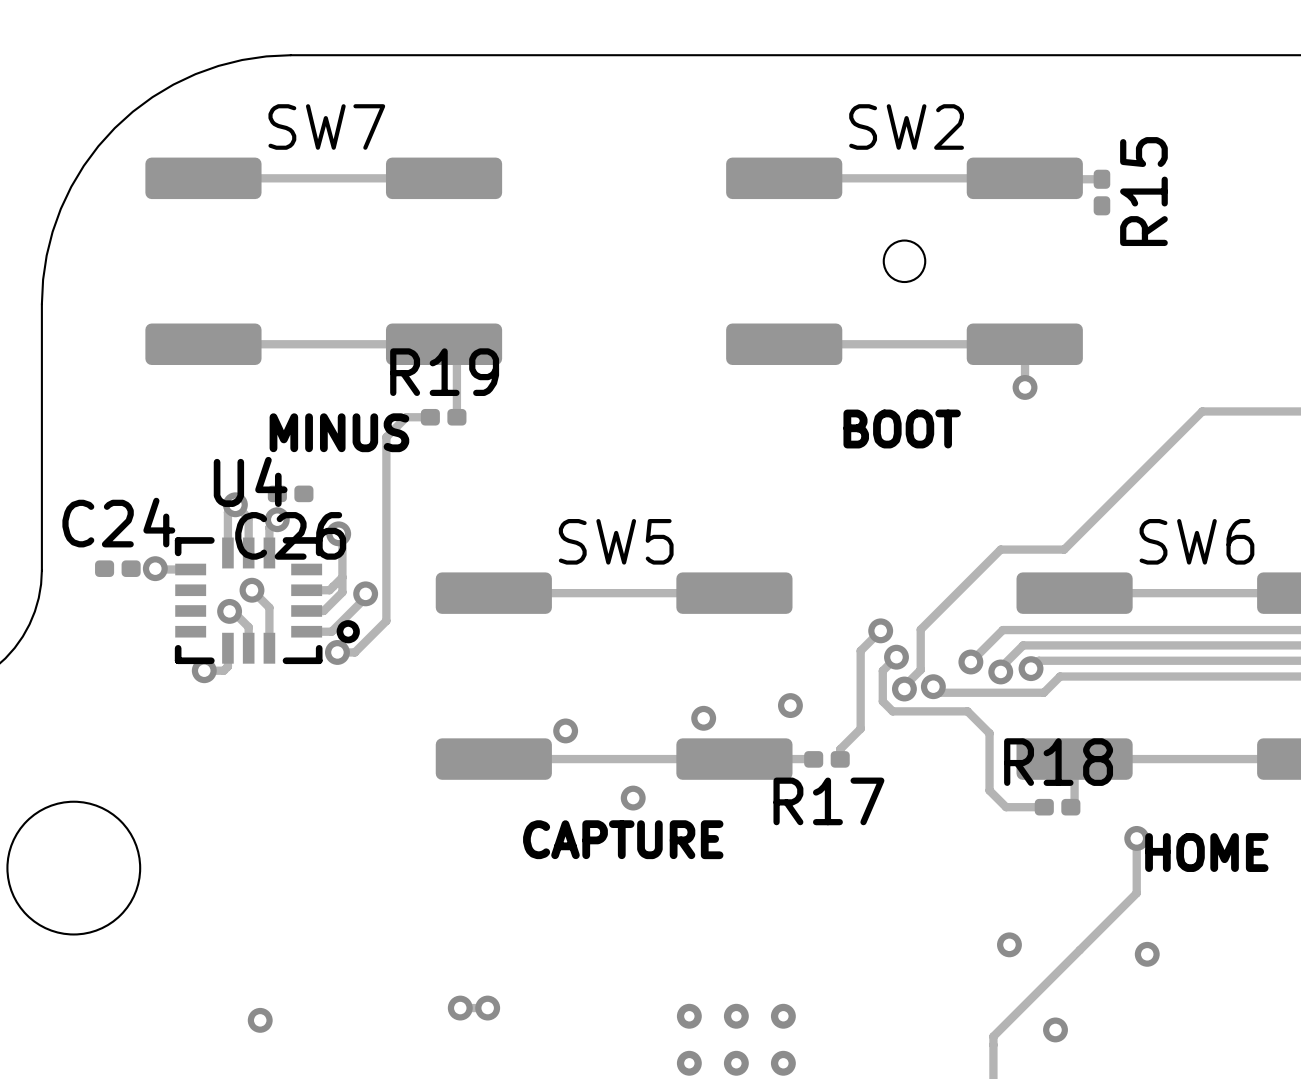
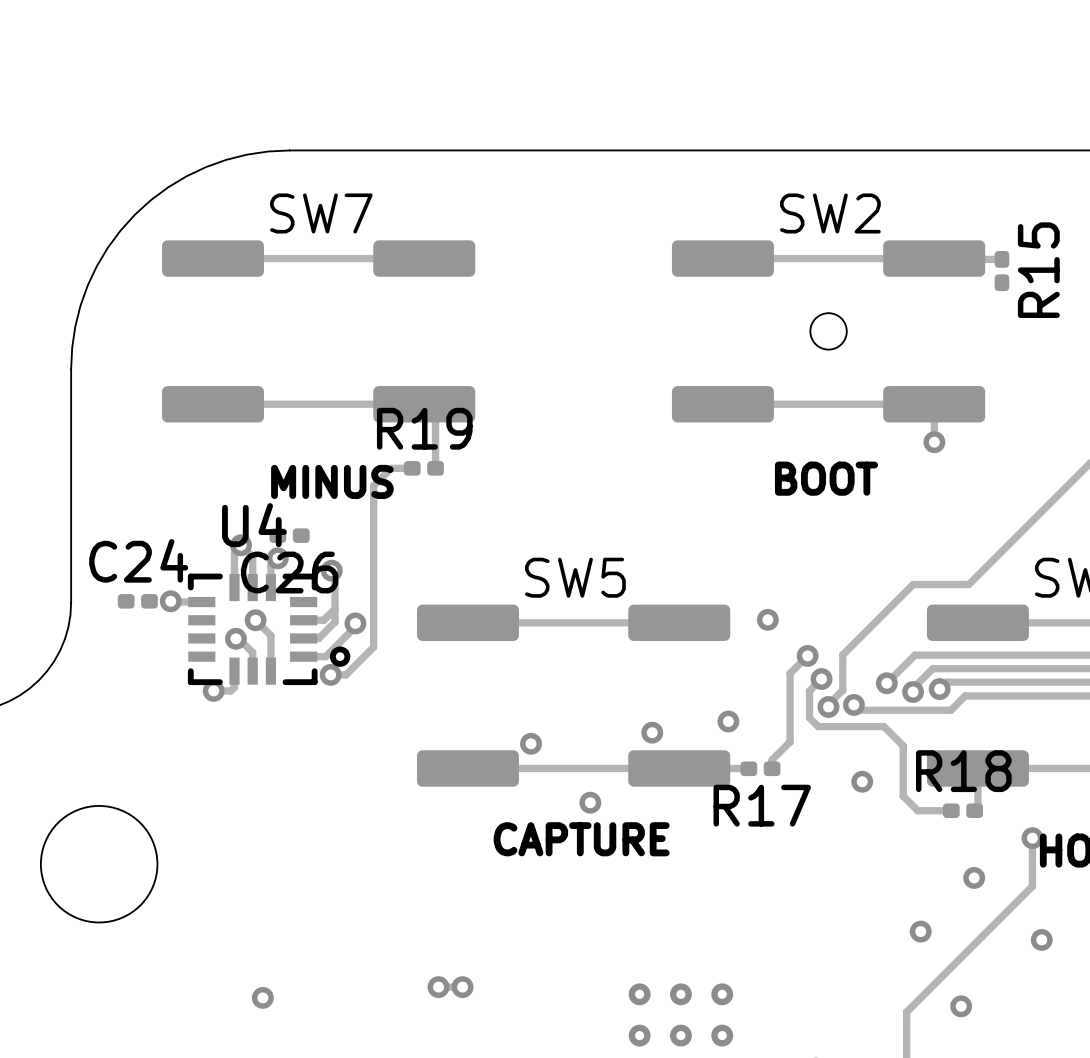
via: none -> (767, 619)
via: none -> (862, 781)
via: none -> (974, 877)

